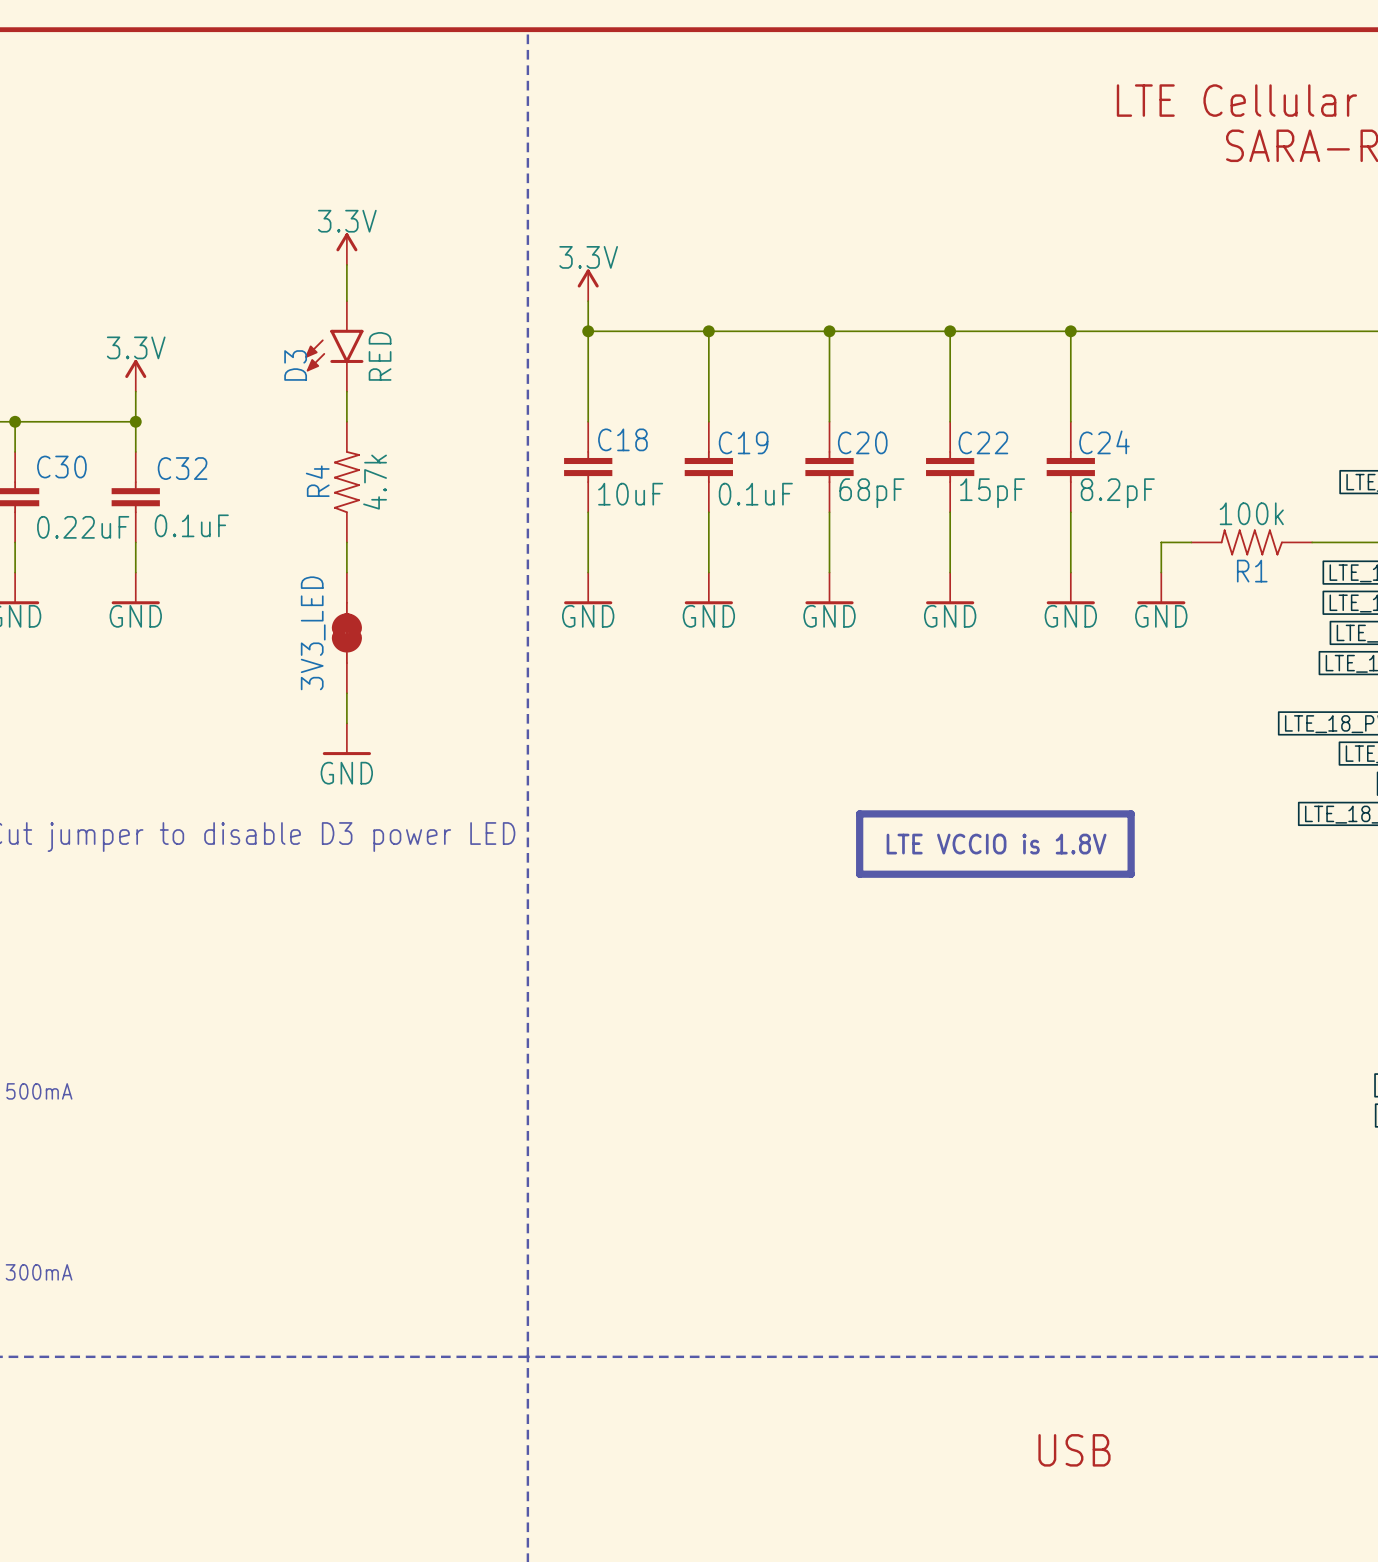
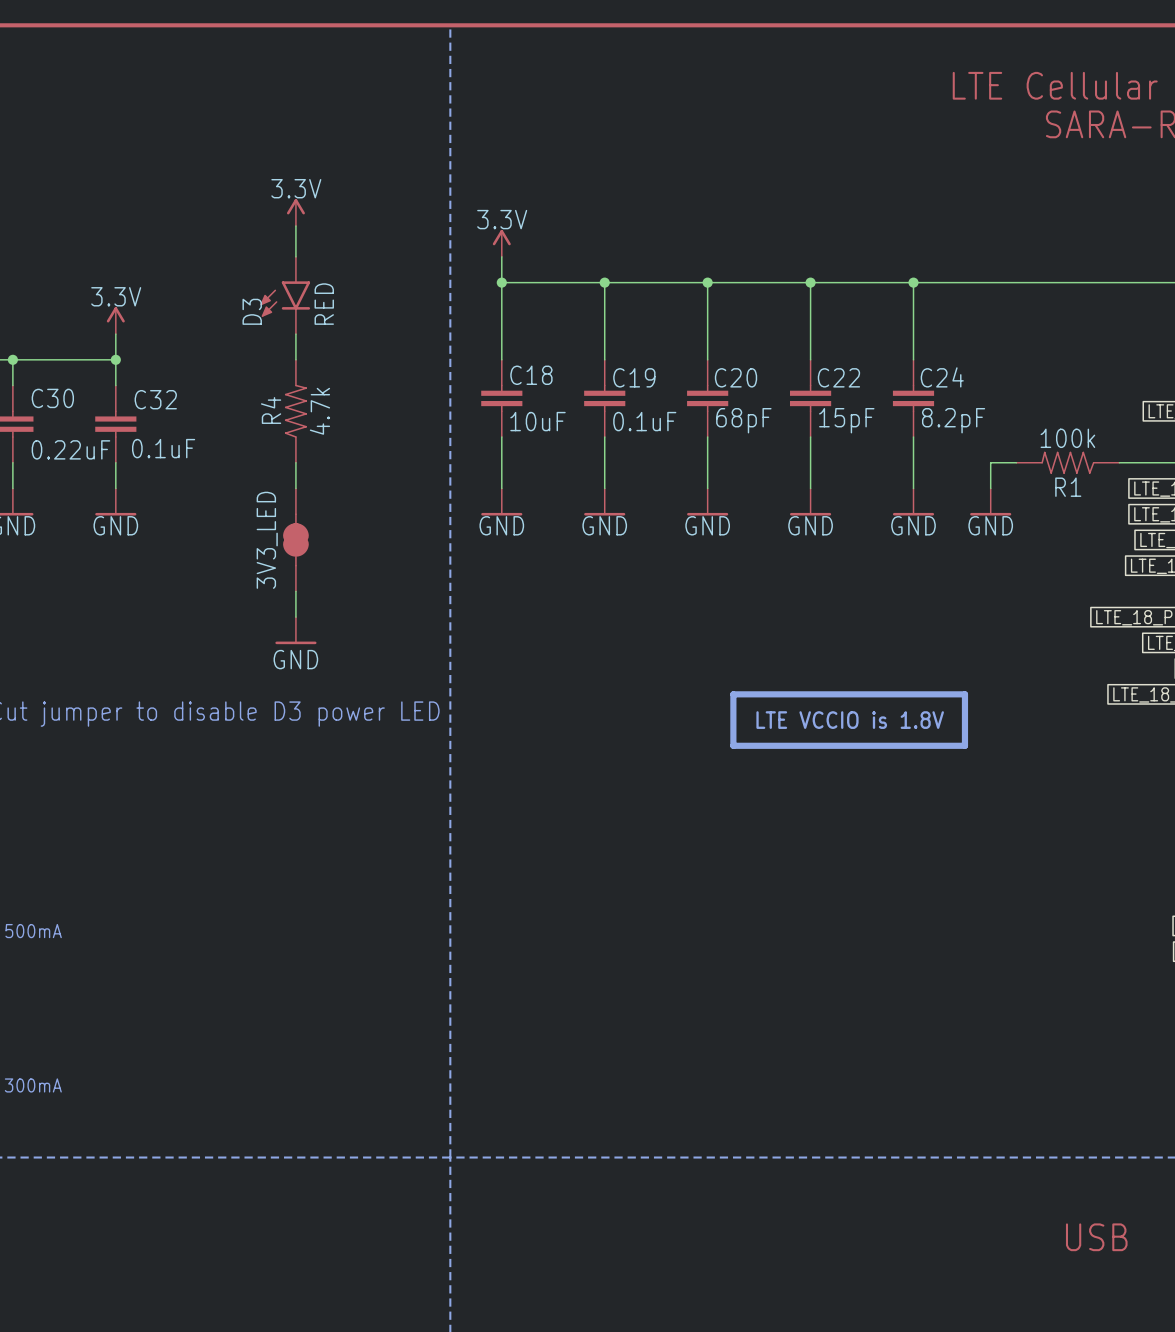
text position: USB (1074, 1450) -> USB (1096, 1237)

